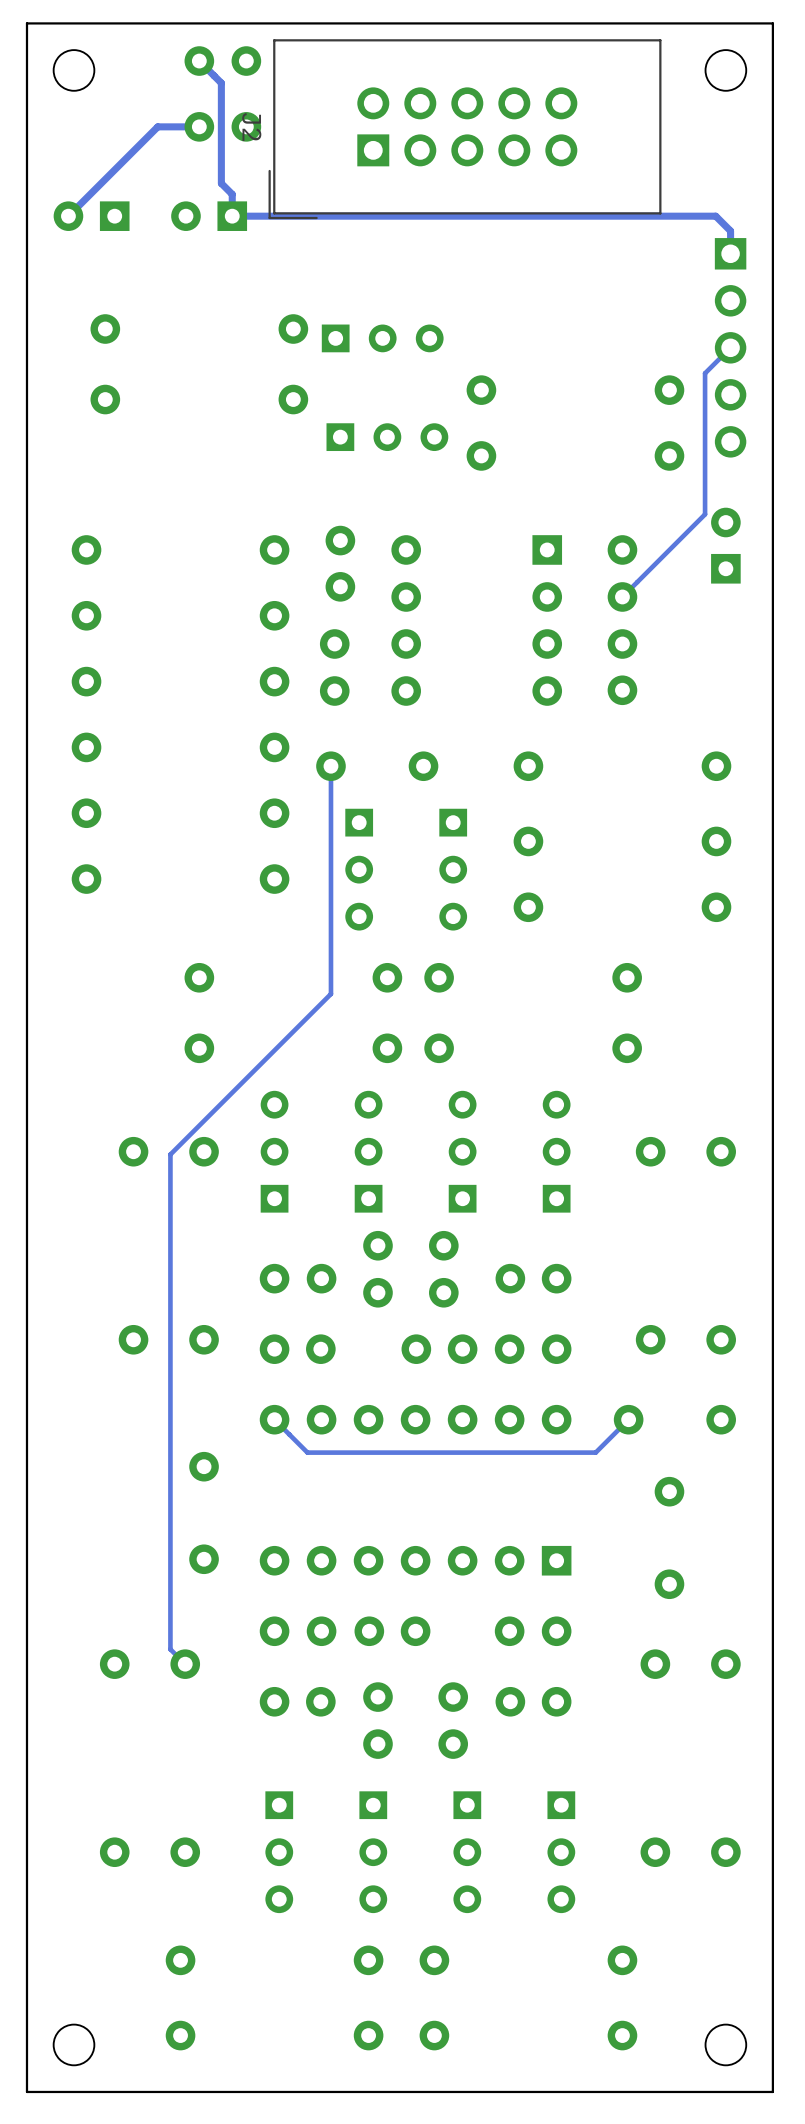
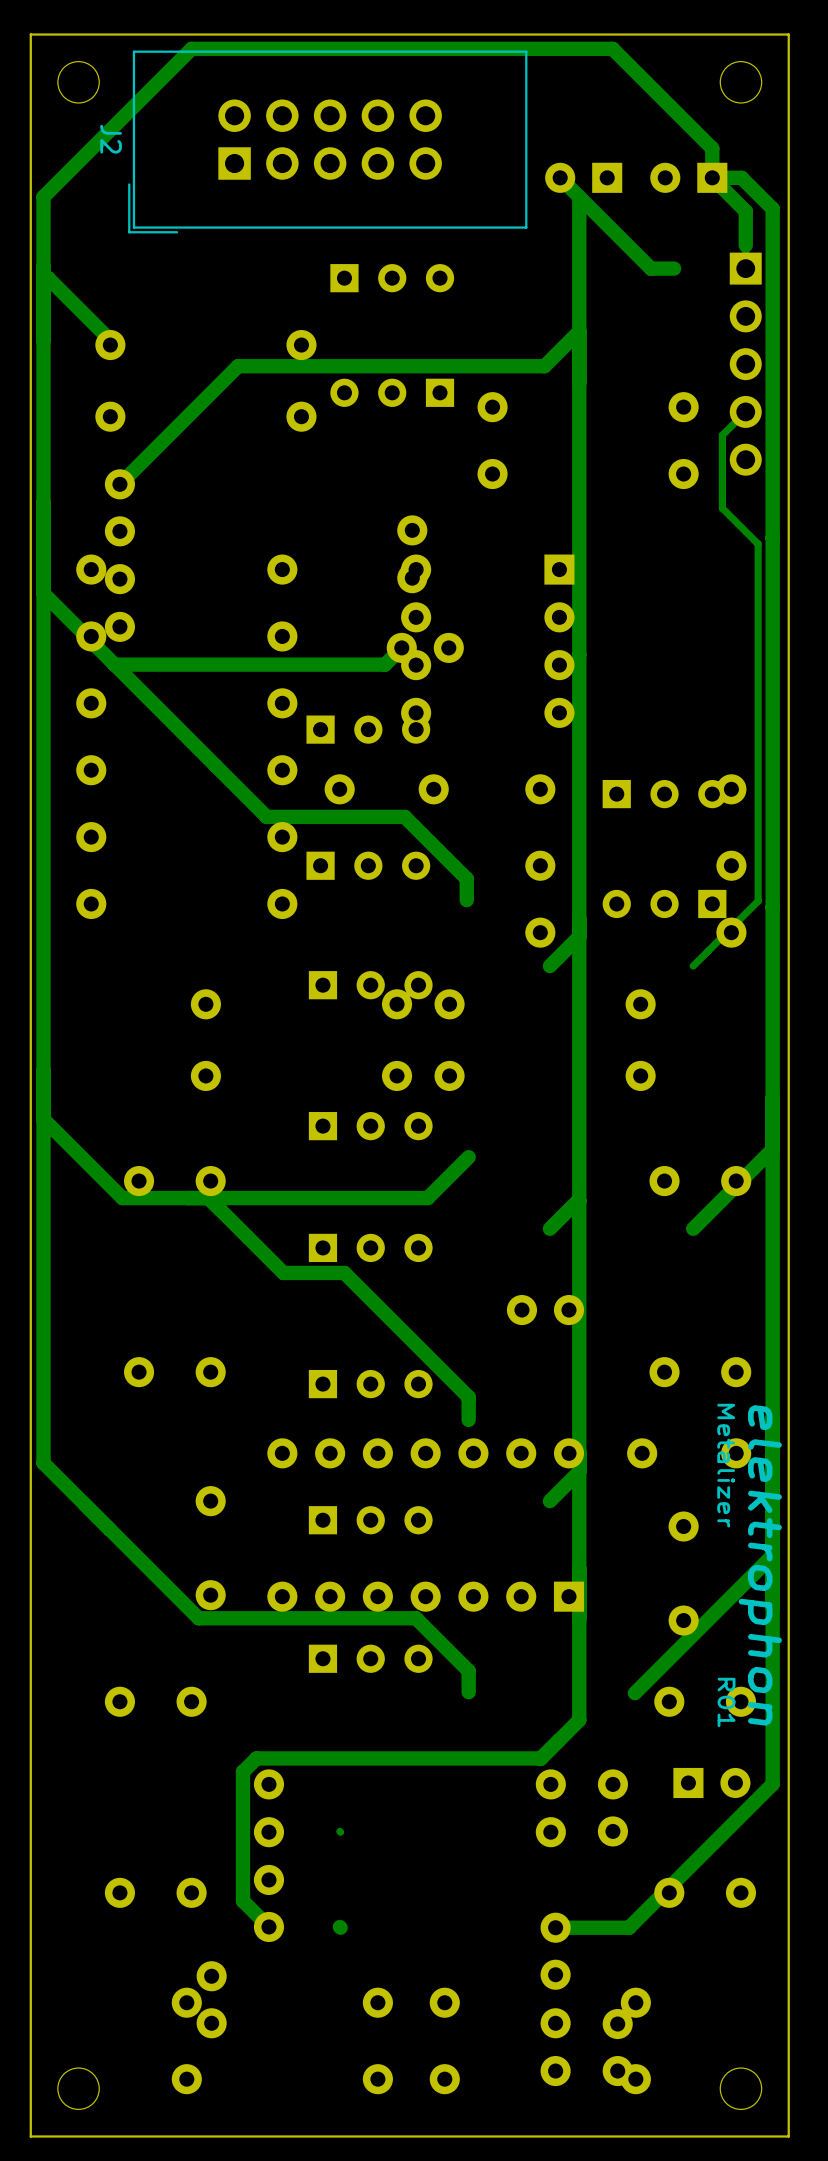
track: (199, 61) (221, 83) (221, 183) (232, 194) (232, 216) (715, 216) (730, 231) -> (712, 177) (745, 211) (745, 245)
part: (222, 61) -> none
track: (199, 126) (157, 126) (68, 216) -> none
part: (222, 126) -> none
J2 position: (465, 129) -> (327, 141)
track: none -> (560, 177) (650, 268) (674, 268)
part: none -> (583, 177)
part: none -> (688, 177)
track: none -> (712, 177) (712, 148) (612, 48) (191, 48) (43, 196) (43, 1463) (198, 1618) (416, 1618) (468, 1670) (468, 1692)
track: none -> (712, 177) (741, 177) (772, 208) (772, 1784) (629, 1927) (555, 1927)
track: none -> (579, 196) (579, 1720) (540, 1759)
part: (91, 216) -> none
part: (209, 216) -> none
track: none -> (43, 278) (48, 278) (110, 340)
part: none -> (392, 278)
track: none -> (579, 331) (544, 366) (238, 366) (119, 484)
part: (382, 338) -> none
track: (730, 347) (705, 373) (705, 514) (622, 596) -> none
part: none -> (392, 392)
track: none -> (745, 411) (722, 435) (722, 508) (758, 544) (758, 901) (693, 966)
part: (387, 437) -> none
part: none -> (119, 507)
part: none -> (412, 554)
part: (725, 545) -> none
part rotation: 0° (340, 563) -> 90° clockwise (425, 647)
part position: (340, 563) -> (425, 647)
track: none -> (43, 593) (96, 646)
part: (622, 573) -> none
part: none -> (119, 603)
track: none -> (96, 646) (266, 816) (404, 816) (466, 878) (466, 900)
track: none -> (401, 647) (385, 664) (114, 664)
part: (334, 667) -> none
part: (622, 667) -> none
part: none -> (368, 729)
track: (330, 766) (330, 993) (170, 1154) (170, 1649) (185, 1664) -> none
part: none -> (664, 794)
part rotation: 0° (359, 869) -> 90° counterclockwise (368, 865)
part: (453, 869) -> none
part: none -> (664, 903)
track: none -> (579, 936) (549, 966)
part: none -> (370, 985)
track: none -> (43, 1119) (122, 1198) (427, 1198) (468, 1157)
part: none -> (370, 1126)
track: none -> (772, 1149) (693, 1228)
part: (274, 1151) -> none
part: (368, 1151) -> none
part: (462, 1151) -> none
part: (556, 1151) -> none
track: none -> (579, 1200) (549, 1228)
track: none -> (220, 1209) (283, 1272) (344, 1272) (468, 1397) (468, 1419)
part: none -> (370, 1247)
part: (377, 1269) -> none
part: (443, 1269) -> none
part: (298, 1278) -> none
part: (297, 1349) -> none
part: (439, 1349) -> none
part: (533, 1349) -> none
part: none -> (370, 1384)
drawing: none -> [717, 1403, 782, 1728]
track: (628, 1419) (595, 1452) (307, 1452) (274, 1419) -> none
track: none -> (579, 1471) (549, 1501)
part: none -> (370, 1520)
track: none -> (772, 1555) (634, 1693)
part: none -> (370, 1658)
part: (298, 1631) -> none
part: (392, 1631) -> none
part: (533, 1631) -> none
part: (297, 1701) -> none
part rotation: 0° (533, 1701) -> 90° clockwise (612, 1807)
part position: (533, 1701) -> (612, 1807)
track: none -> (540, 1758) (256, 1758) (243, 1771) (243, 1901) (268, 1926)
part: (377, 1720) -> none
part: (453, 1720) -> none
part: none -> (711, 1782)
part: none -> (268, 1808)
part: none -> (550, 1808)
track: none -> (339, 1831) (340, 1832)
part: (279, 1852) -> none
part: (373, 1852) -> none
part: (467, 1852) -> none
part: (561, 1852) -> none
part: none -> (268, 1903)
track: none -> (339, 1926) (340, 1927)
part: none -> (555, 1951)
part: none -> (211, 1999)
part: none -> (555, 2047)
part: none -> (617, 2047)

